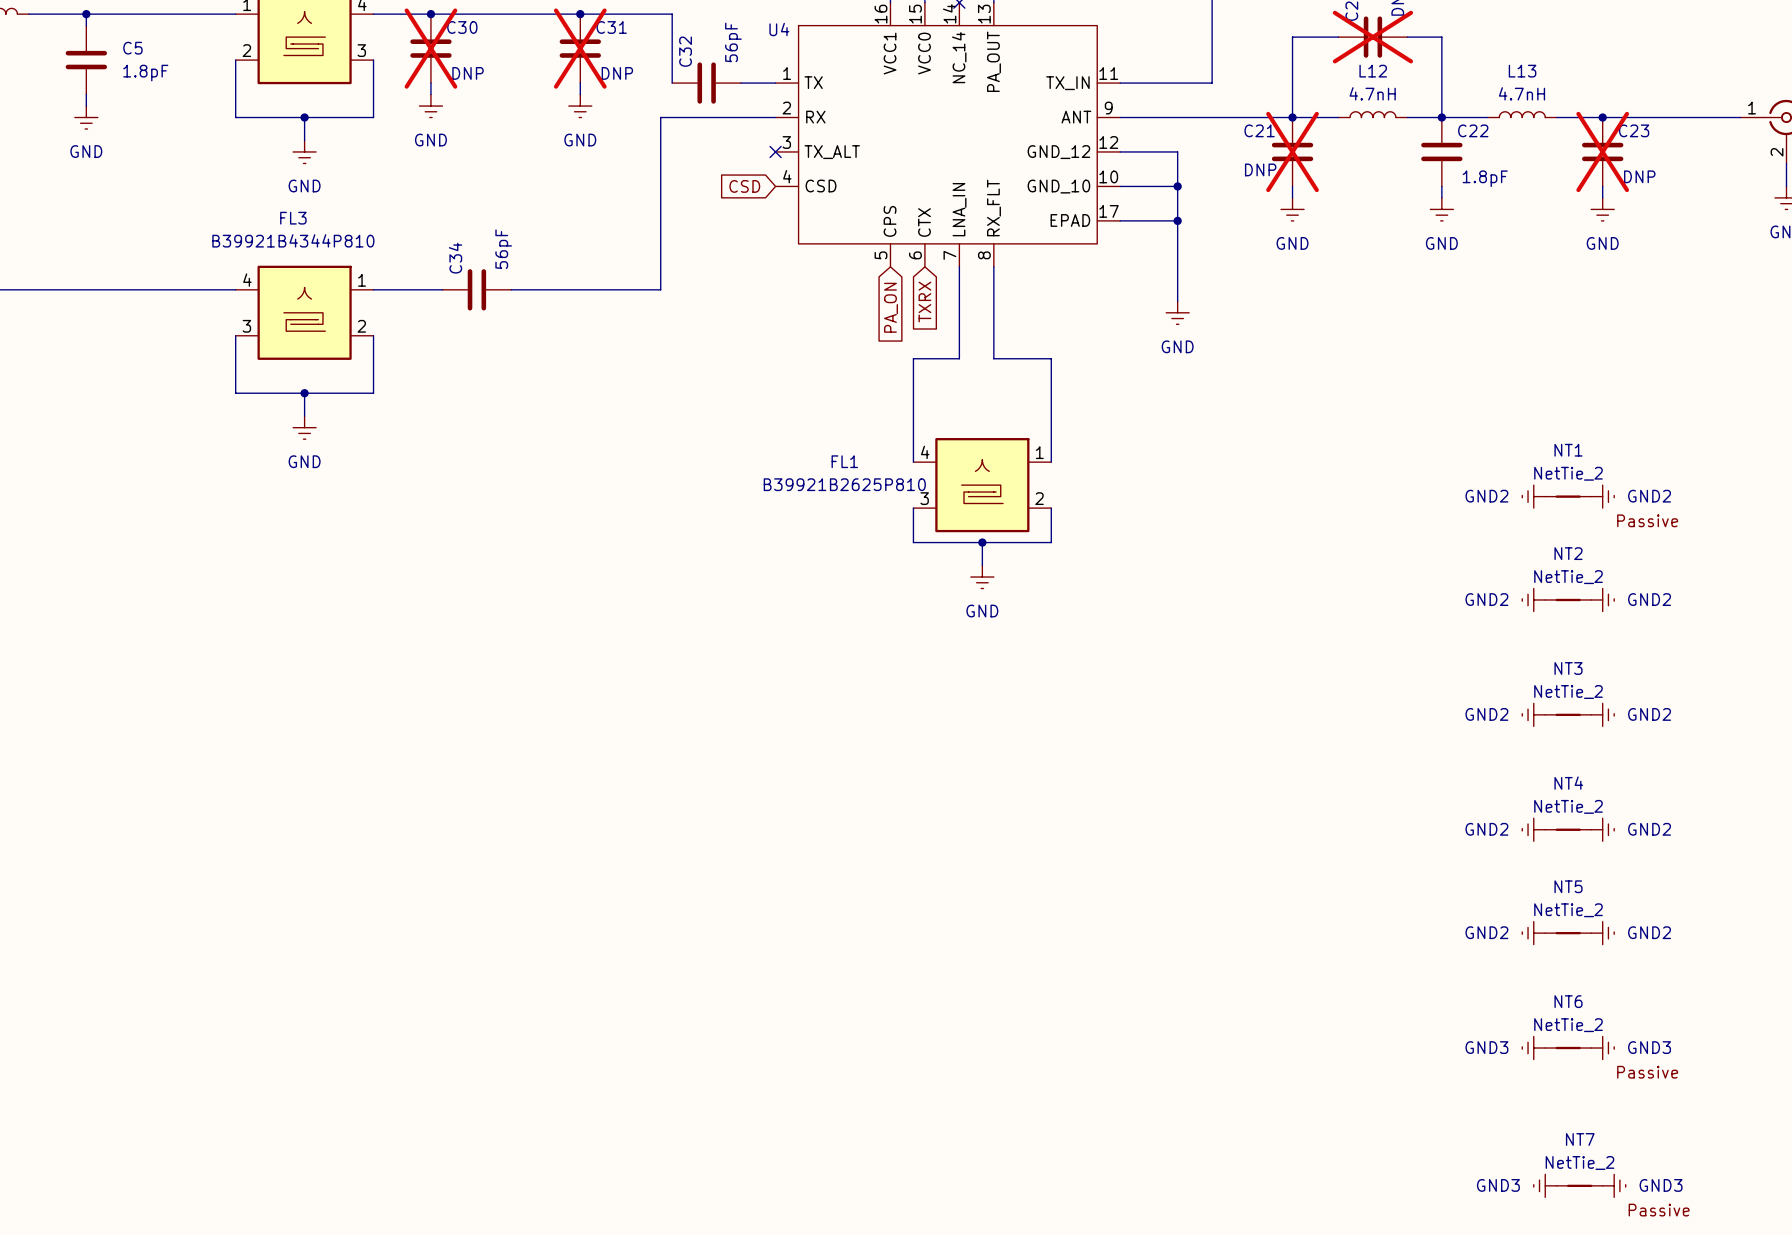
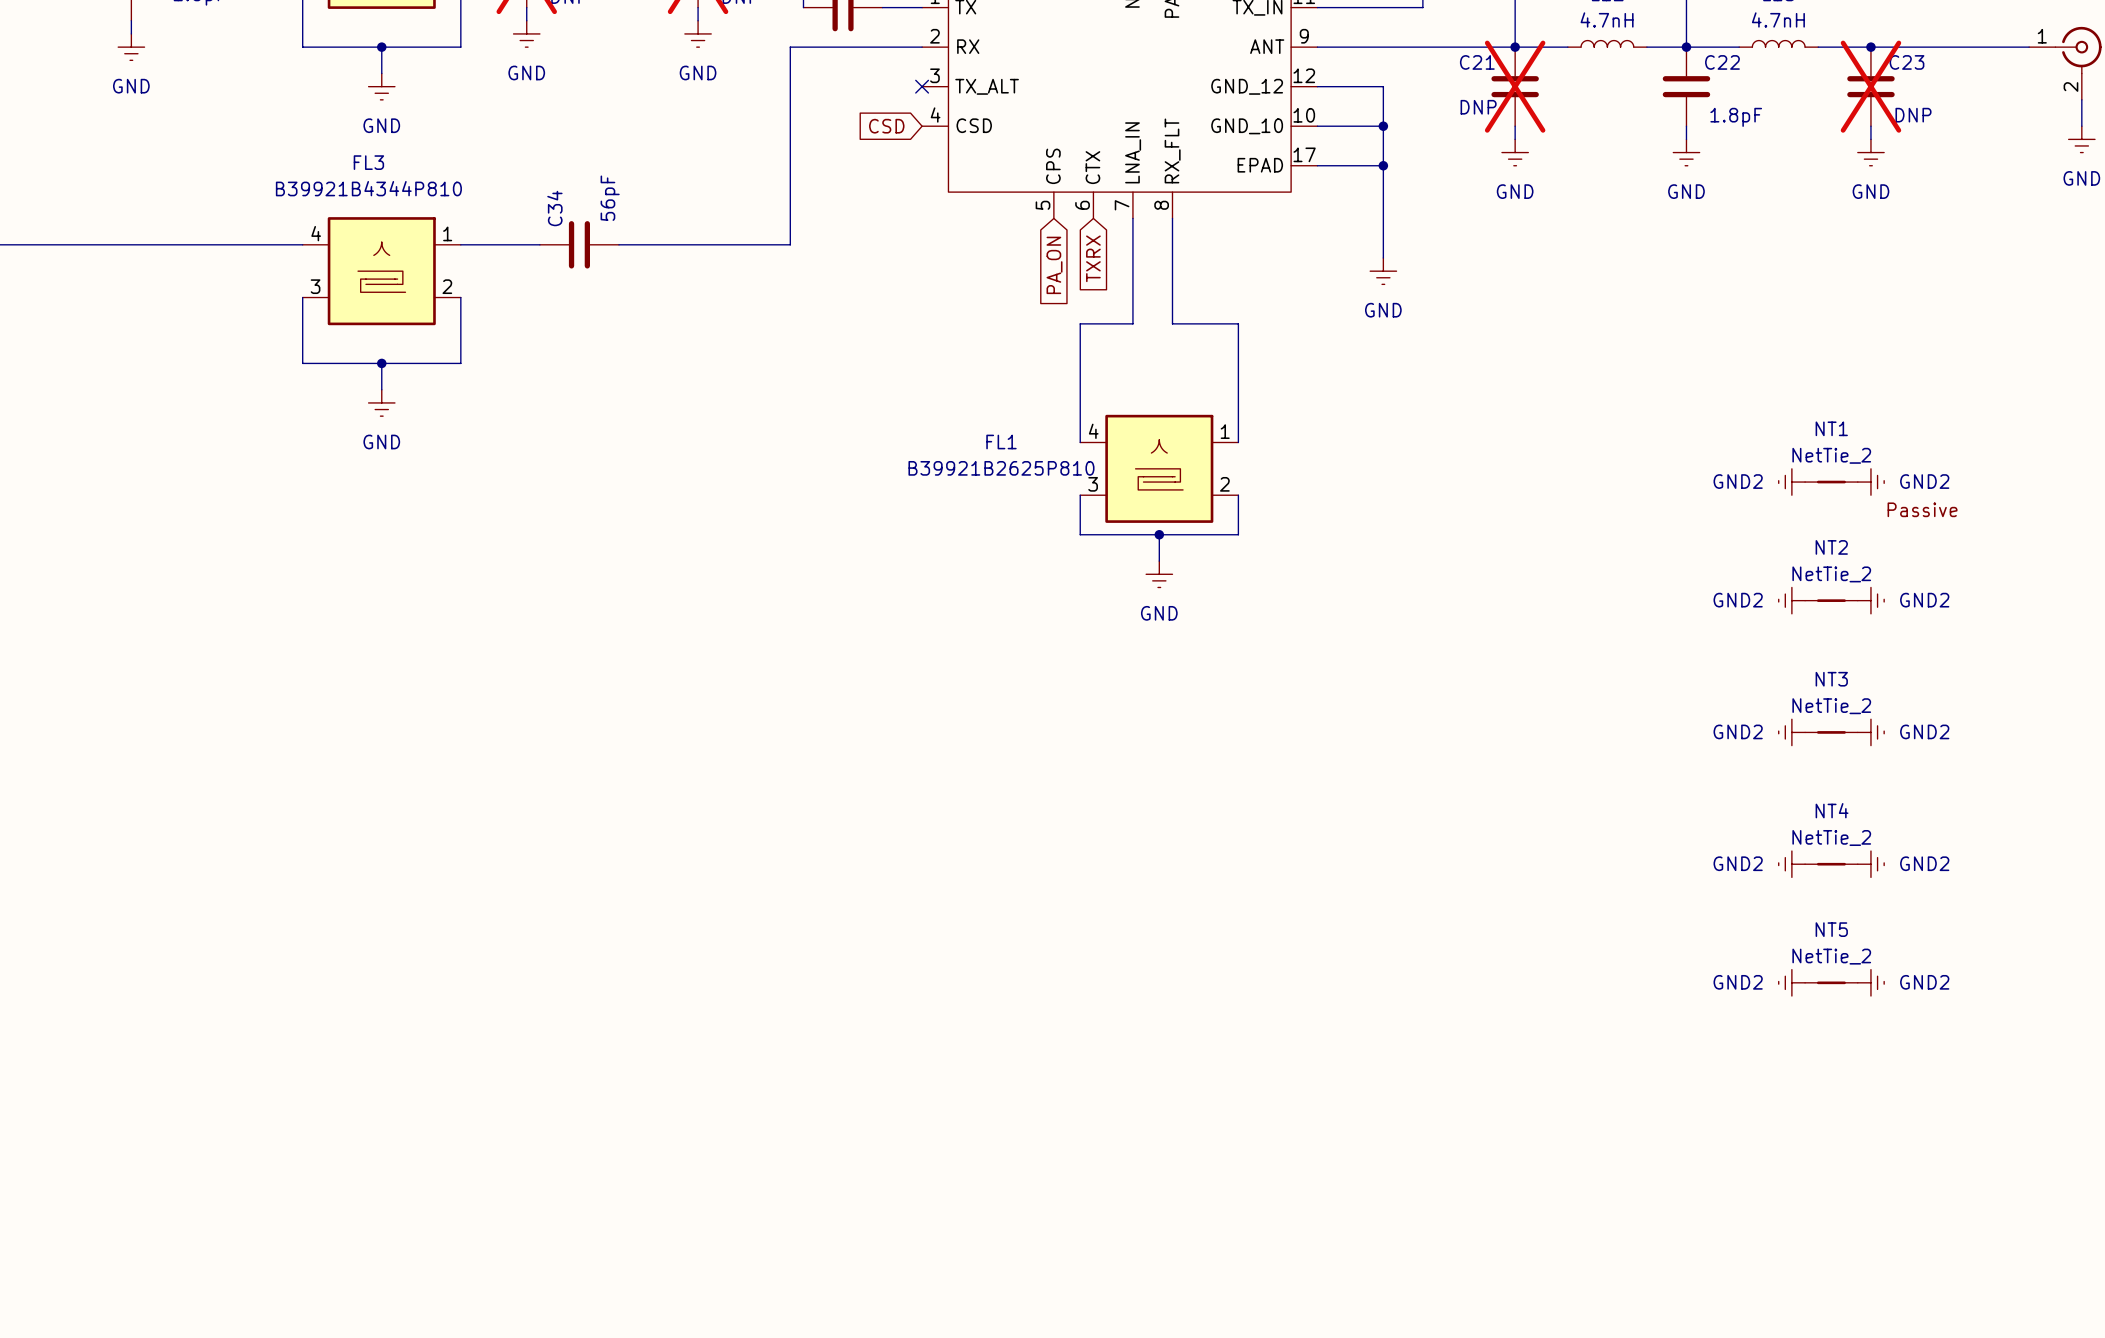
power symbol: GND3 (1533, 1048) -> none
NT6: NetTie_2 (1568, 1048) -> none
power symbol: GND3 (1602, 1048) -> none
label: Passive (1647, 1072) -> none
power symbol: GND3 (1545, 1185) -> none
NT7: NetTie_2 (1579, 1185) -> none
power symbol: GND3 (1614, 1185) -> none
label: Passive (1659, 1210) -> none

